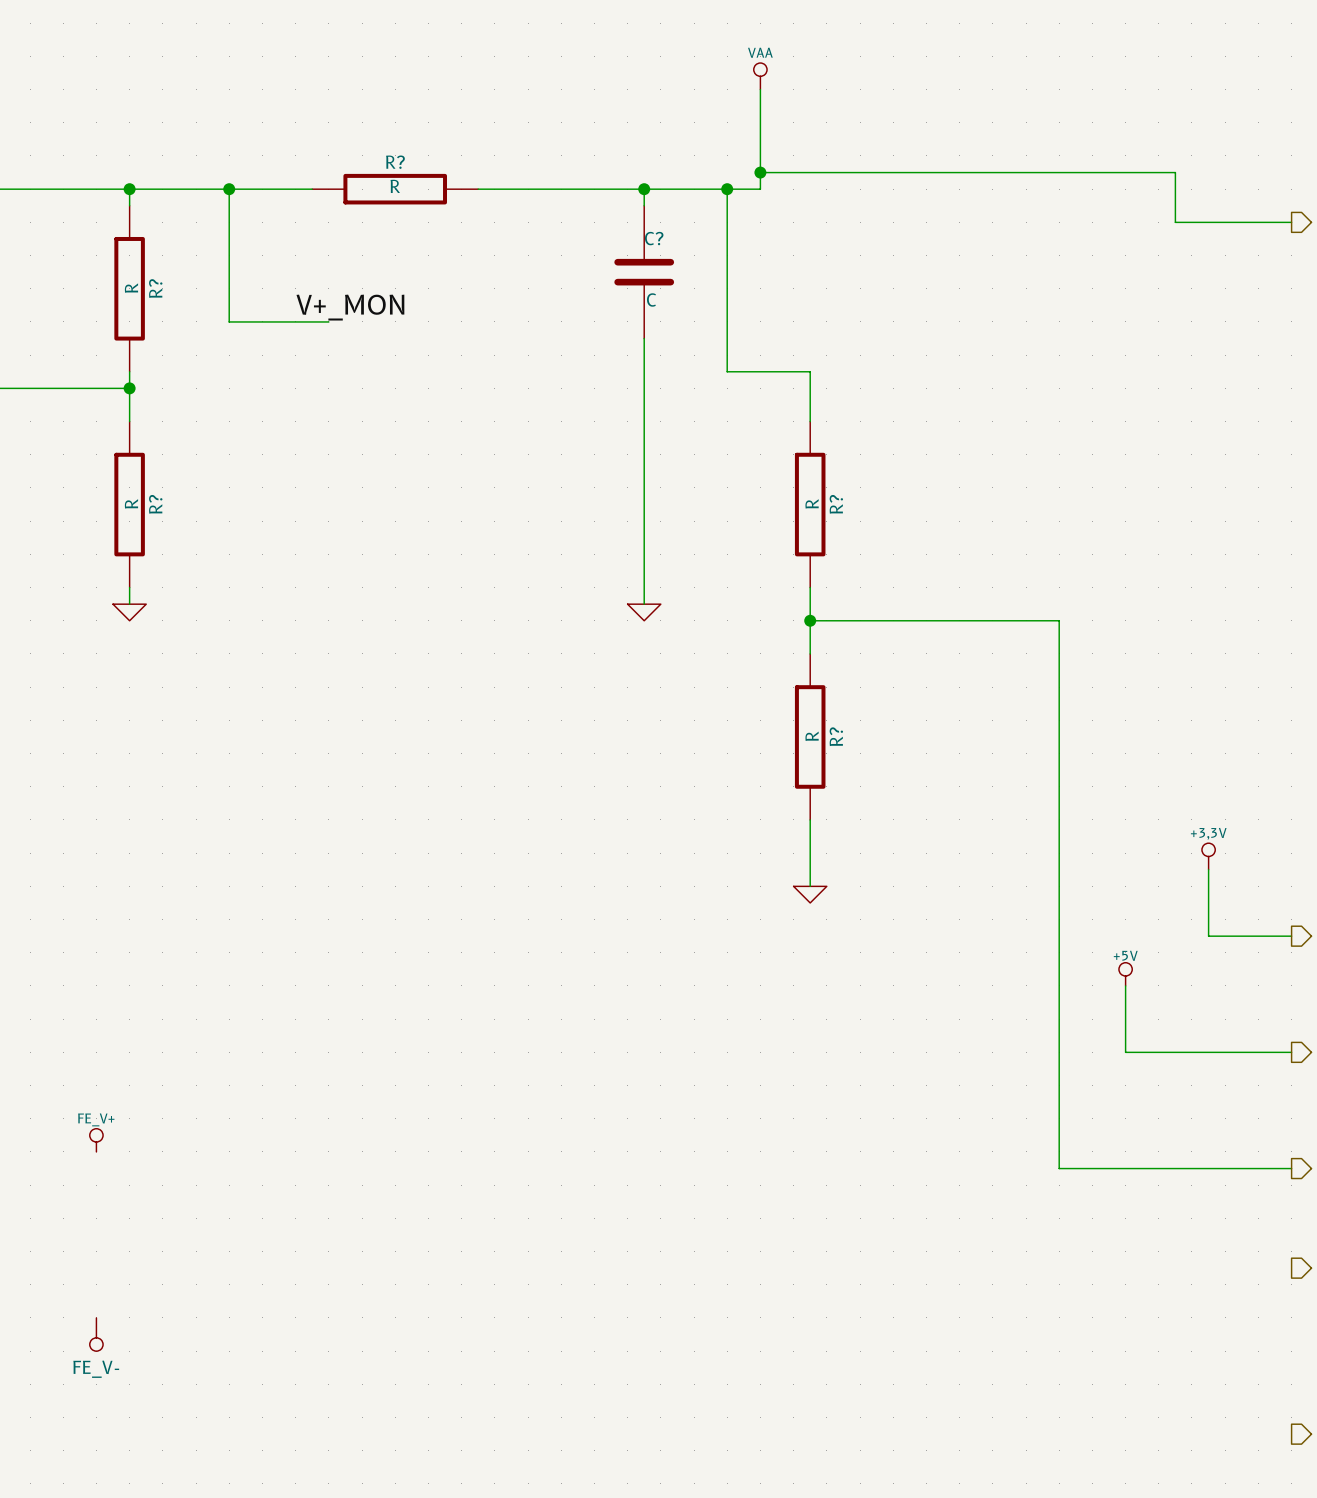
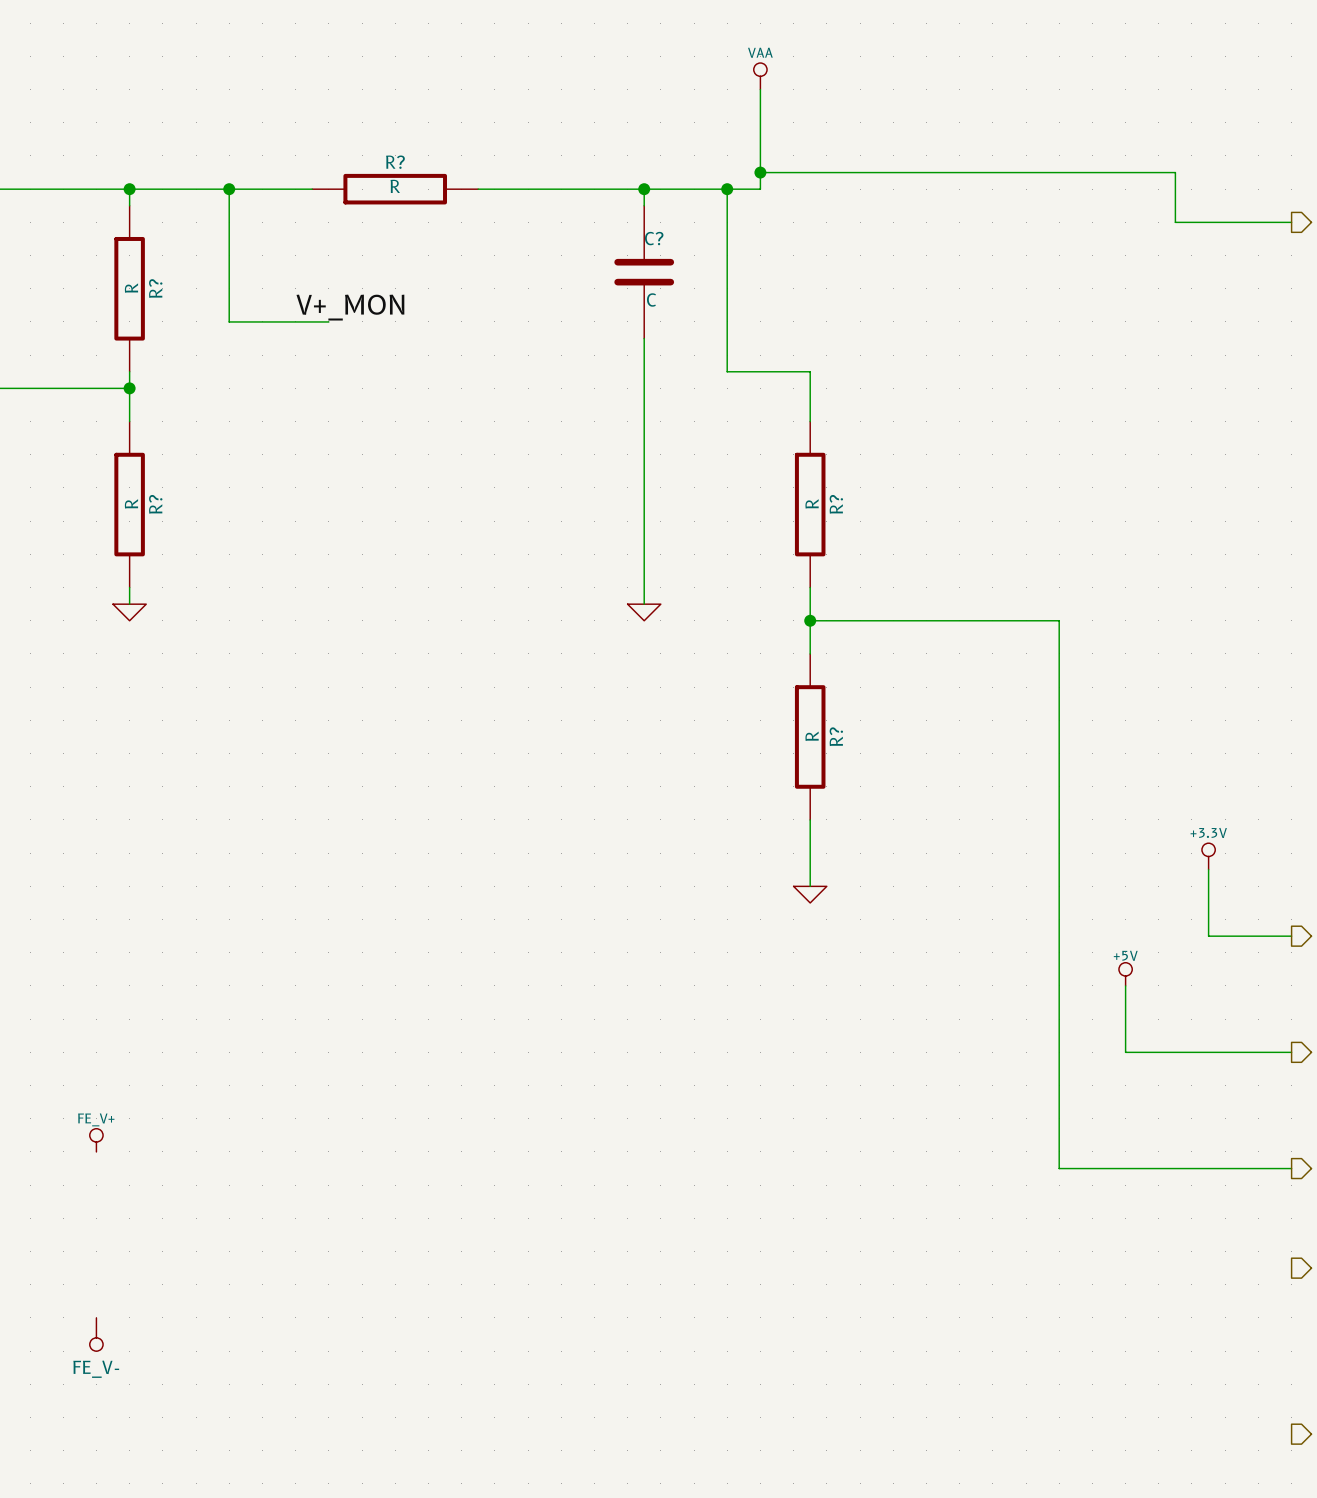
power symbol: +3,3V (1208, 856) -> +3.3V (1208, 856)

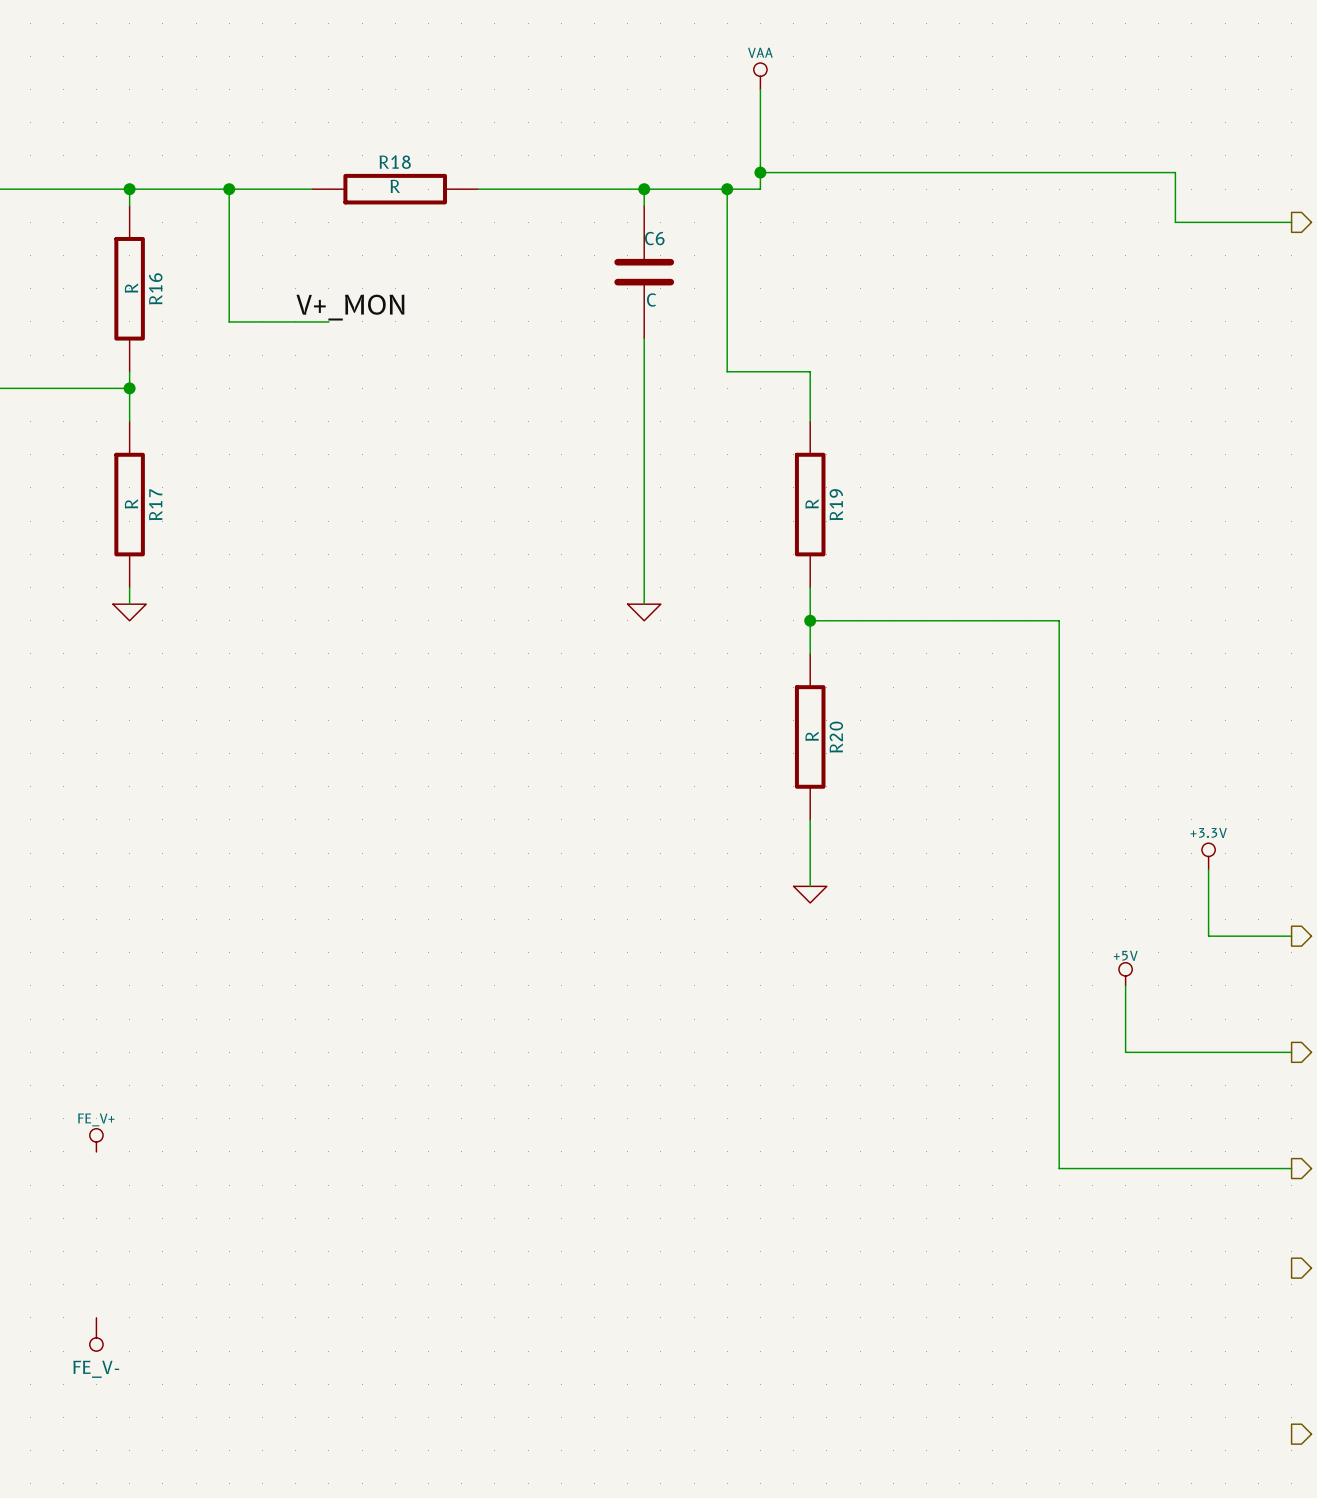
R? name: R? (395, 162) -> R18 (395, 162)
C? name: C? (654, 238) -> C6 (654, 238)
R? name: R? (155, 288) -> R16 (155, 288)
R? name: R? (155, 504) -> R17 (155, 504)
R? name: R? (836, 504) -> R19 (836, 504)
R? name: R? (836, 736) -> R20 (836, 737)

